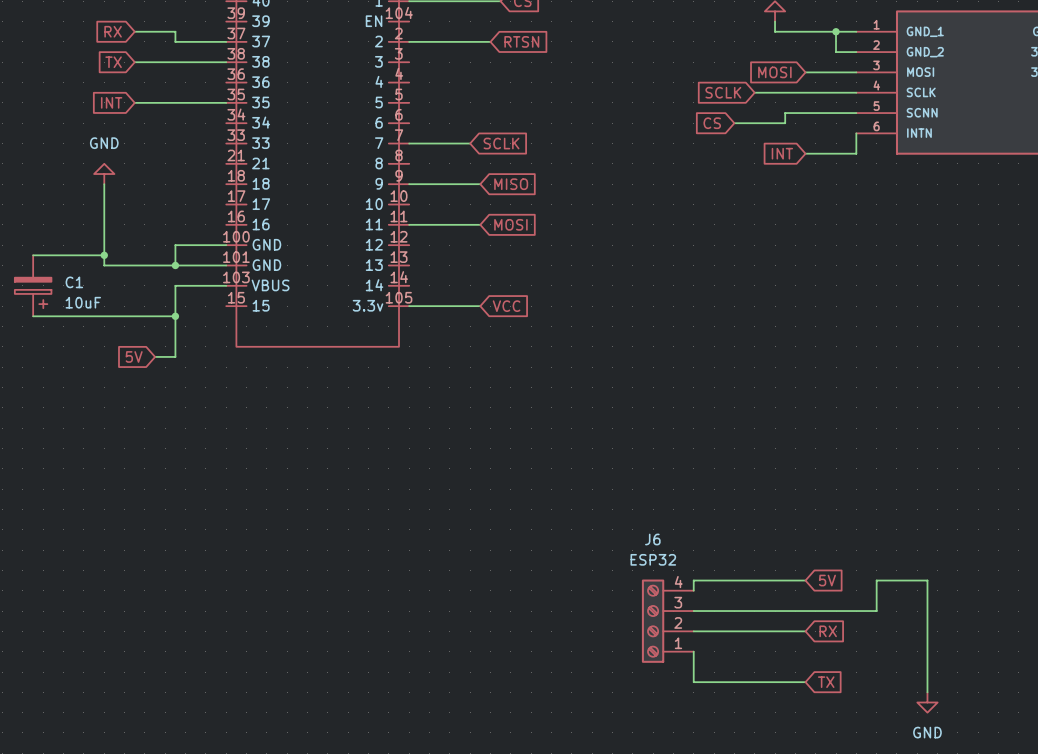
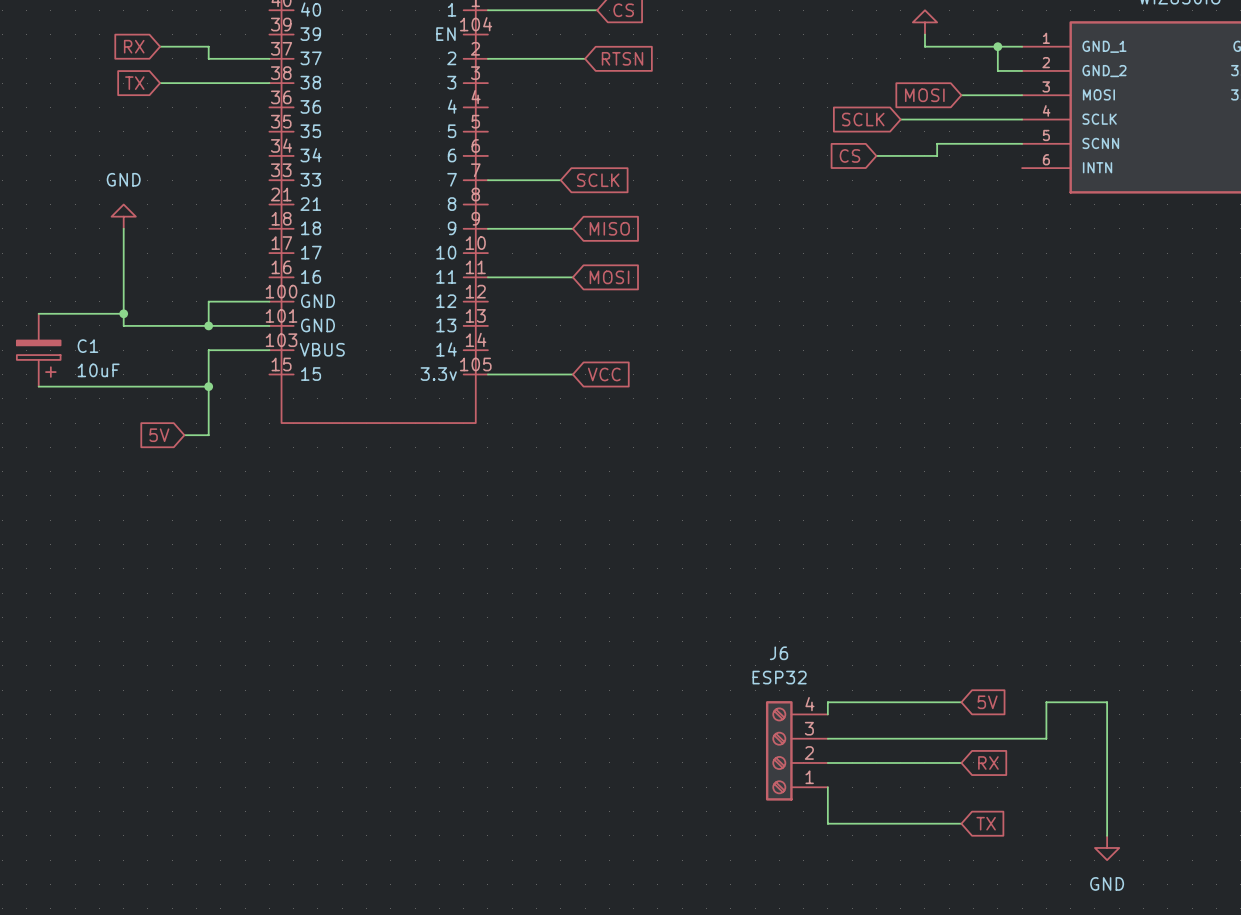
global label: INT (111, 102) -> none
wire: (134, 102) (226, 102) -> none
wire: (856, 133) (856, 153) (805, 153) -> none
global label: INT (782, 153) -> none

